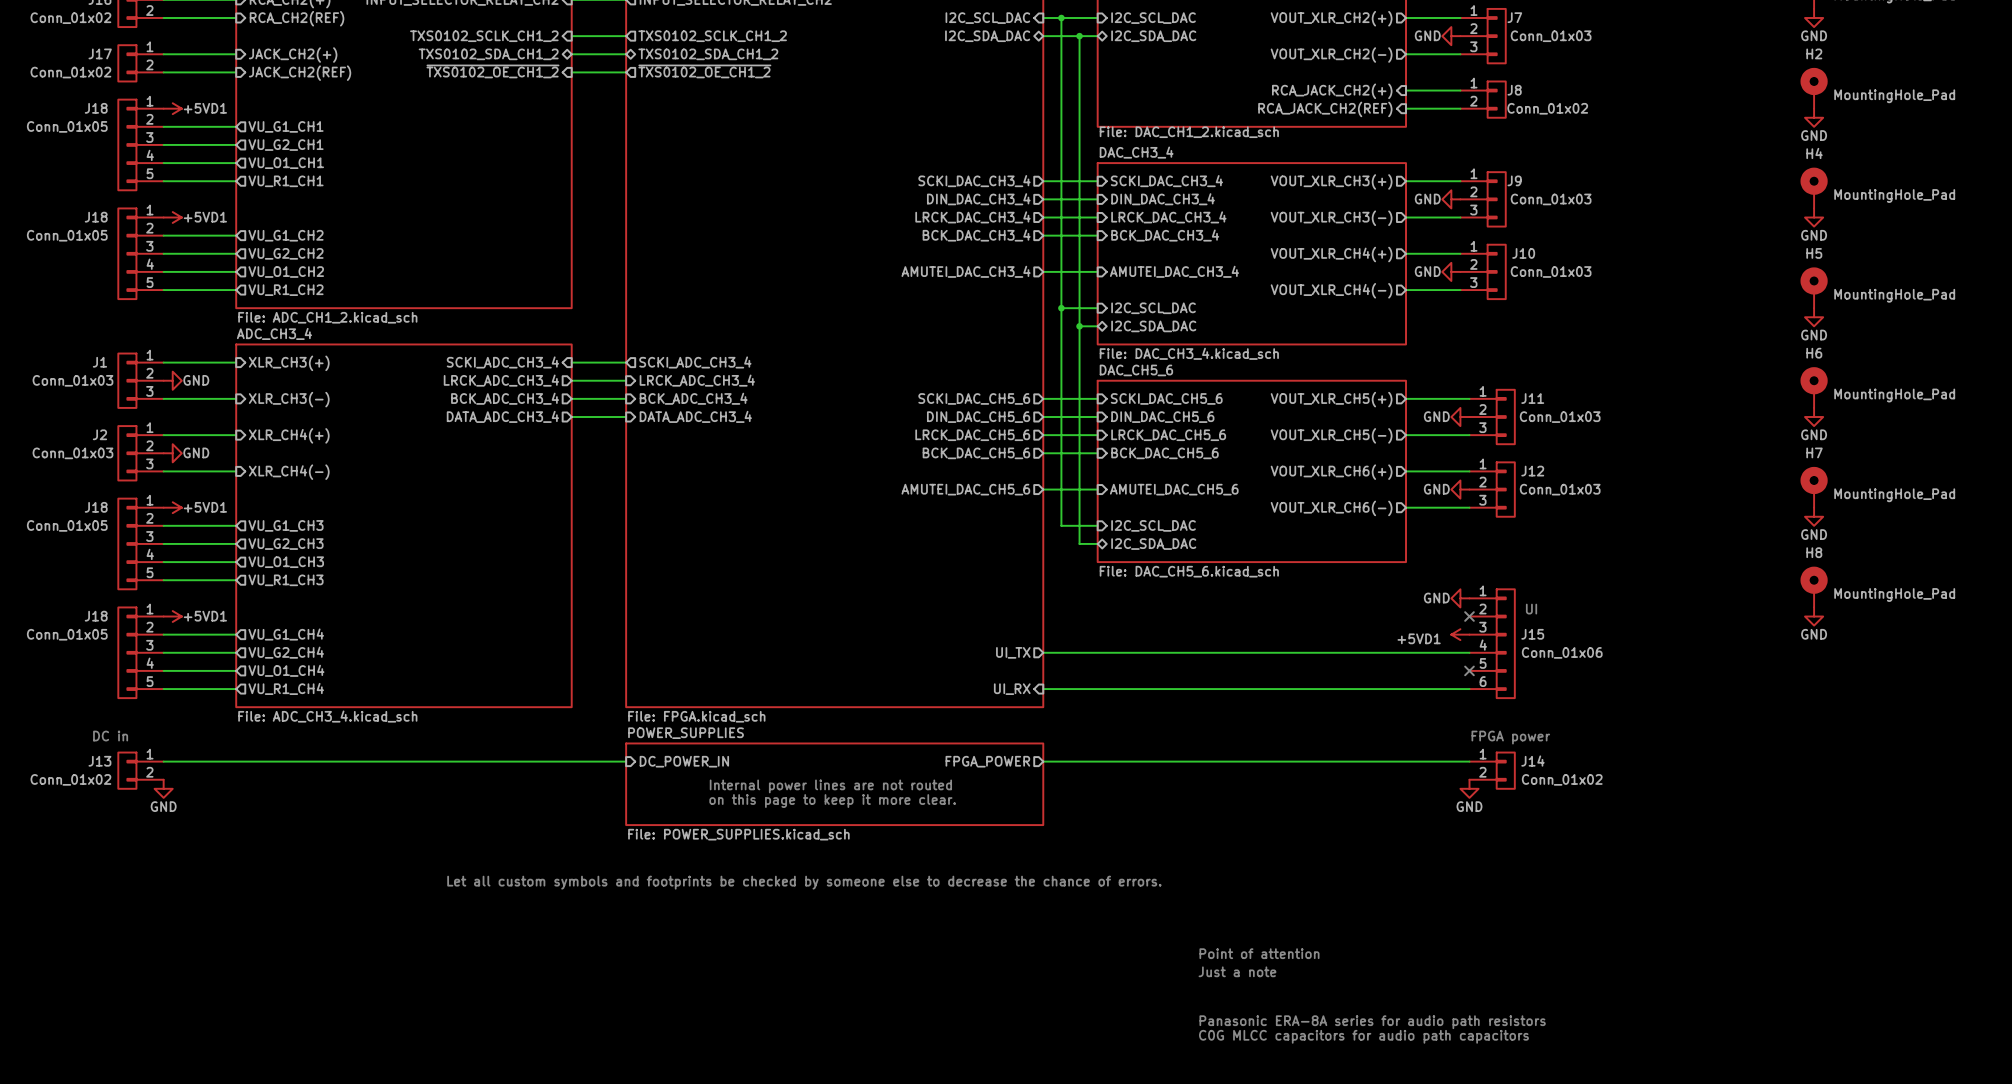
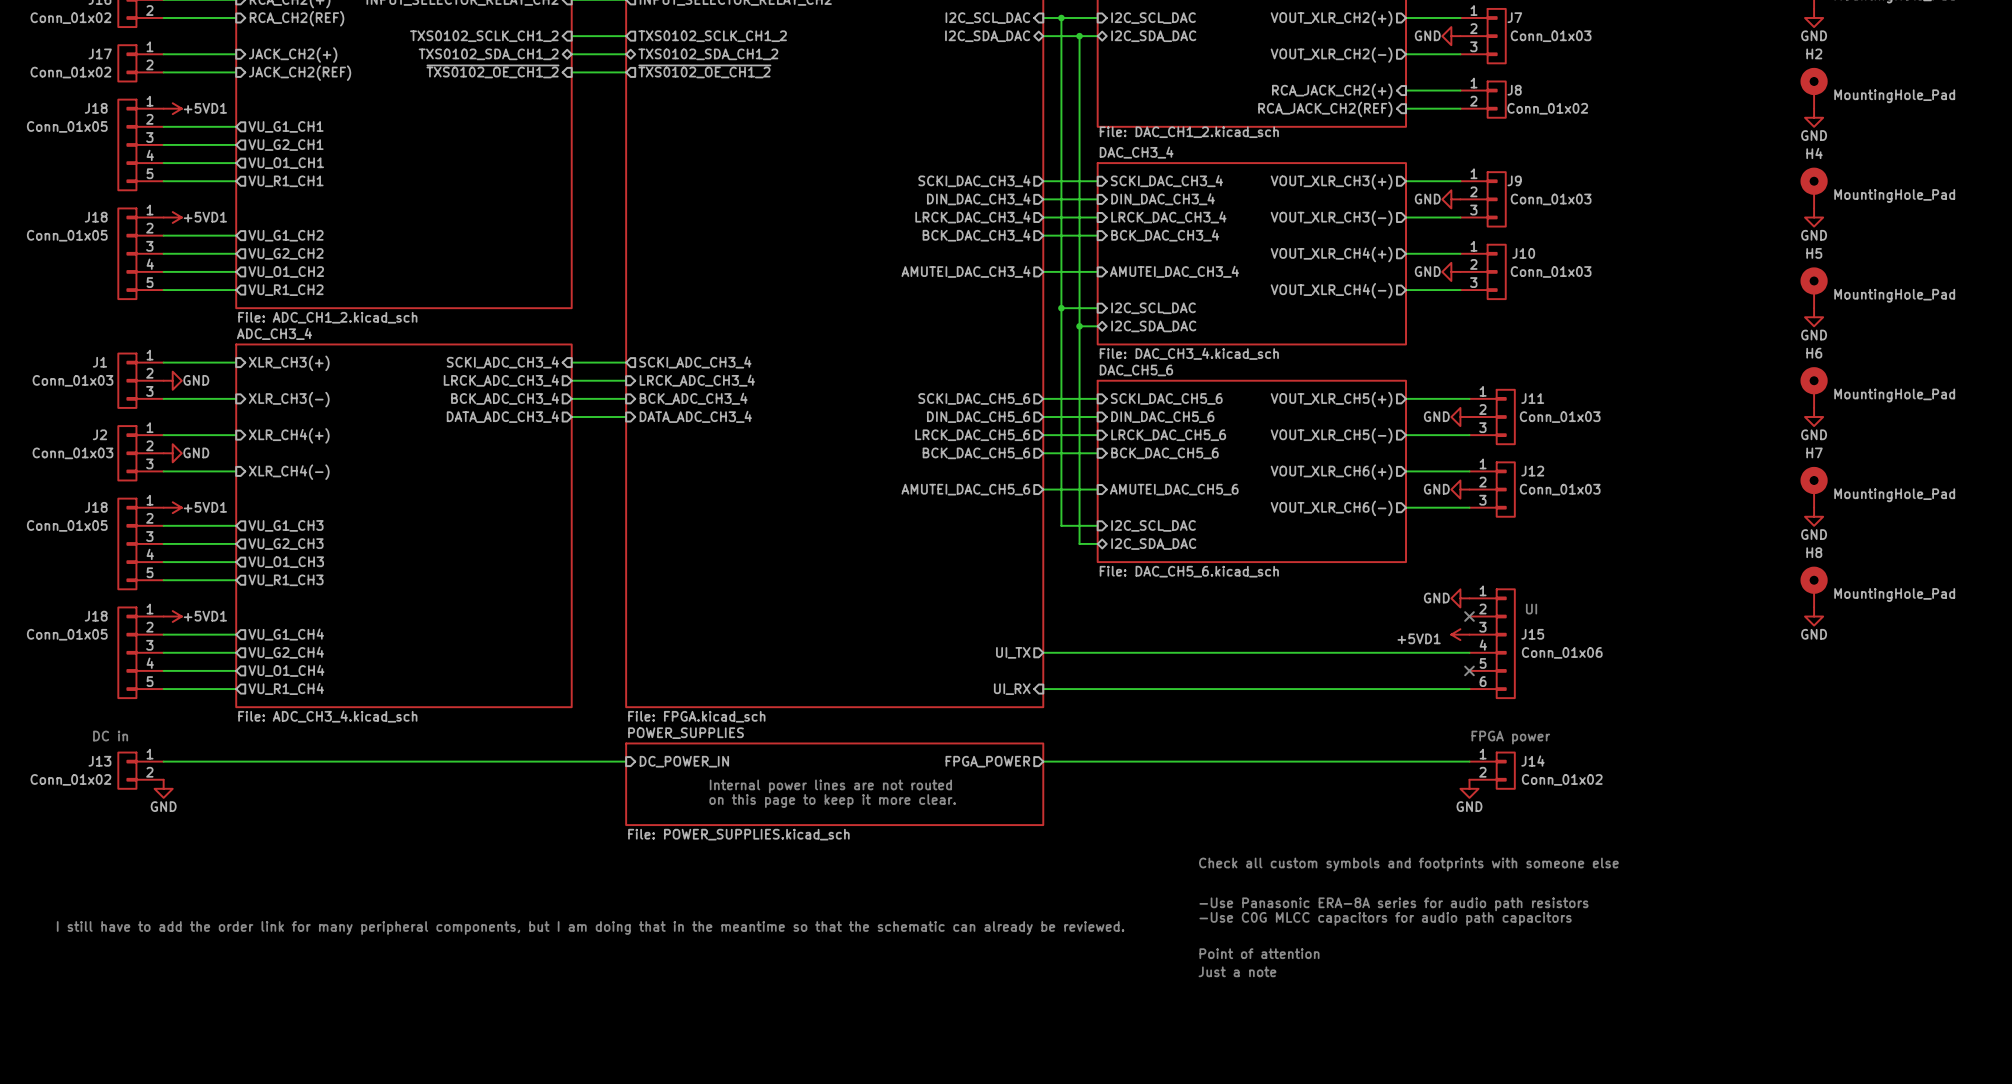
text: none -> Check all custom symbols and footprints with someone else (1408, 864)
text: Let all custom symbols and footprints be checked by someone else to decrease the chance of errors. (804, 882) -> none
text: none -> -Use Panasonic ERA-8A series for audio path resistors (1393, 904)
text: none -> -Use C0G MLCC capacitors for audio path capacitors (1385, 918)
text: none -> I still have to add the order link for many peripheral components, but I am doing that in the meantime so that the schematic can already be reviewed. (590, 927)
text: Panasonic ERA-8A series for audio path resistors (1372, 1022) -> none
text: C0G MLCC capacitors for audio path capacitors (1363, 1036) -> none

